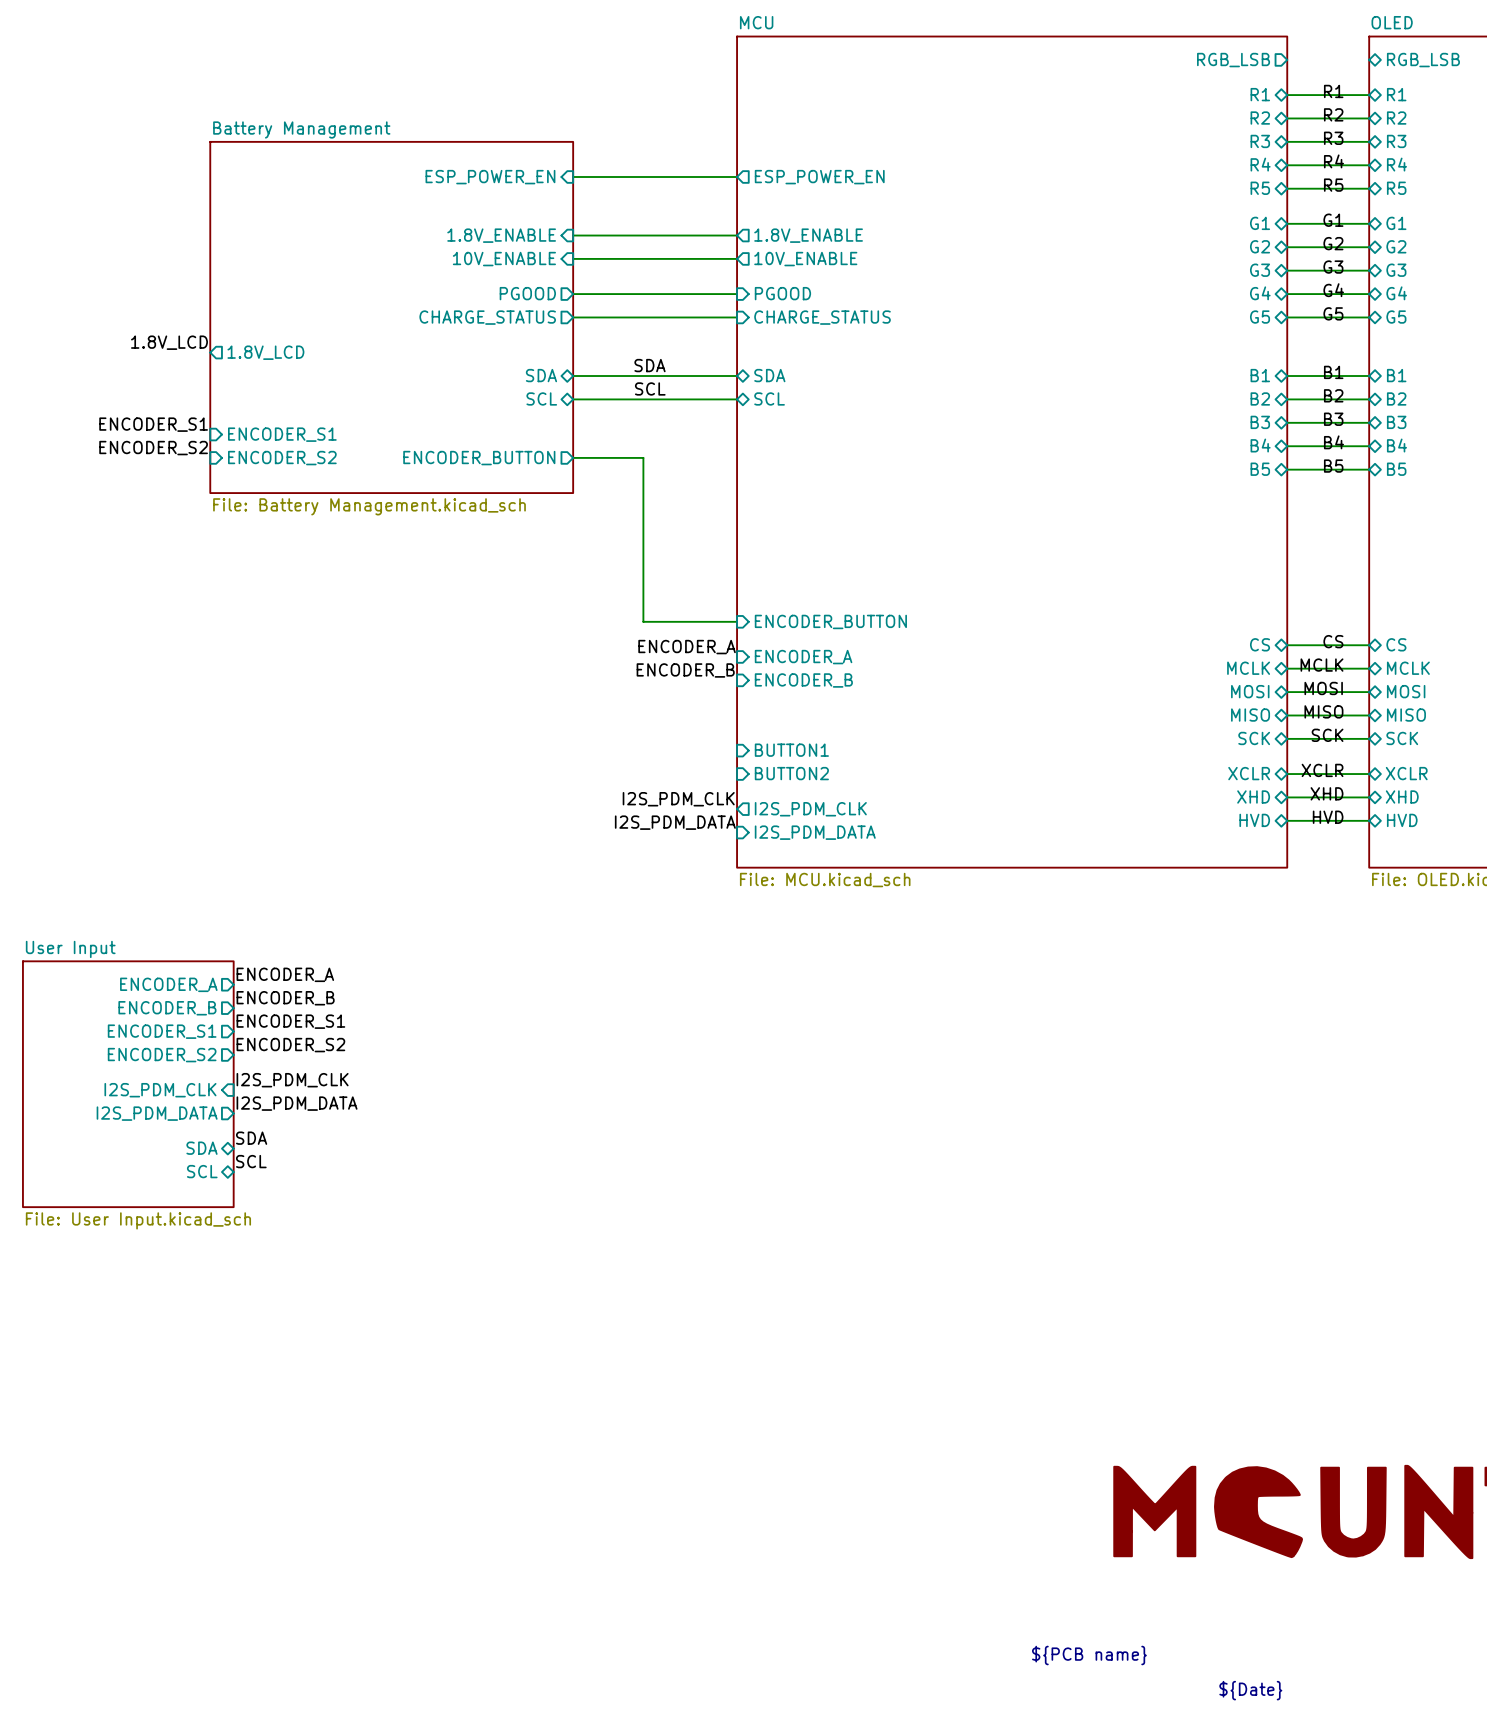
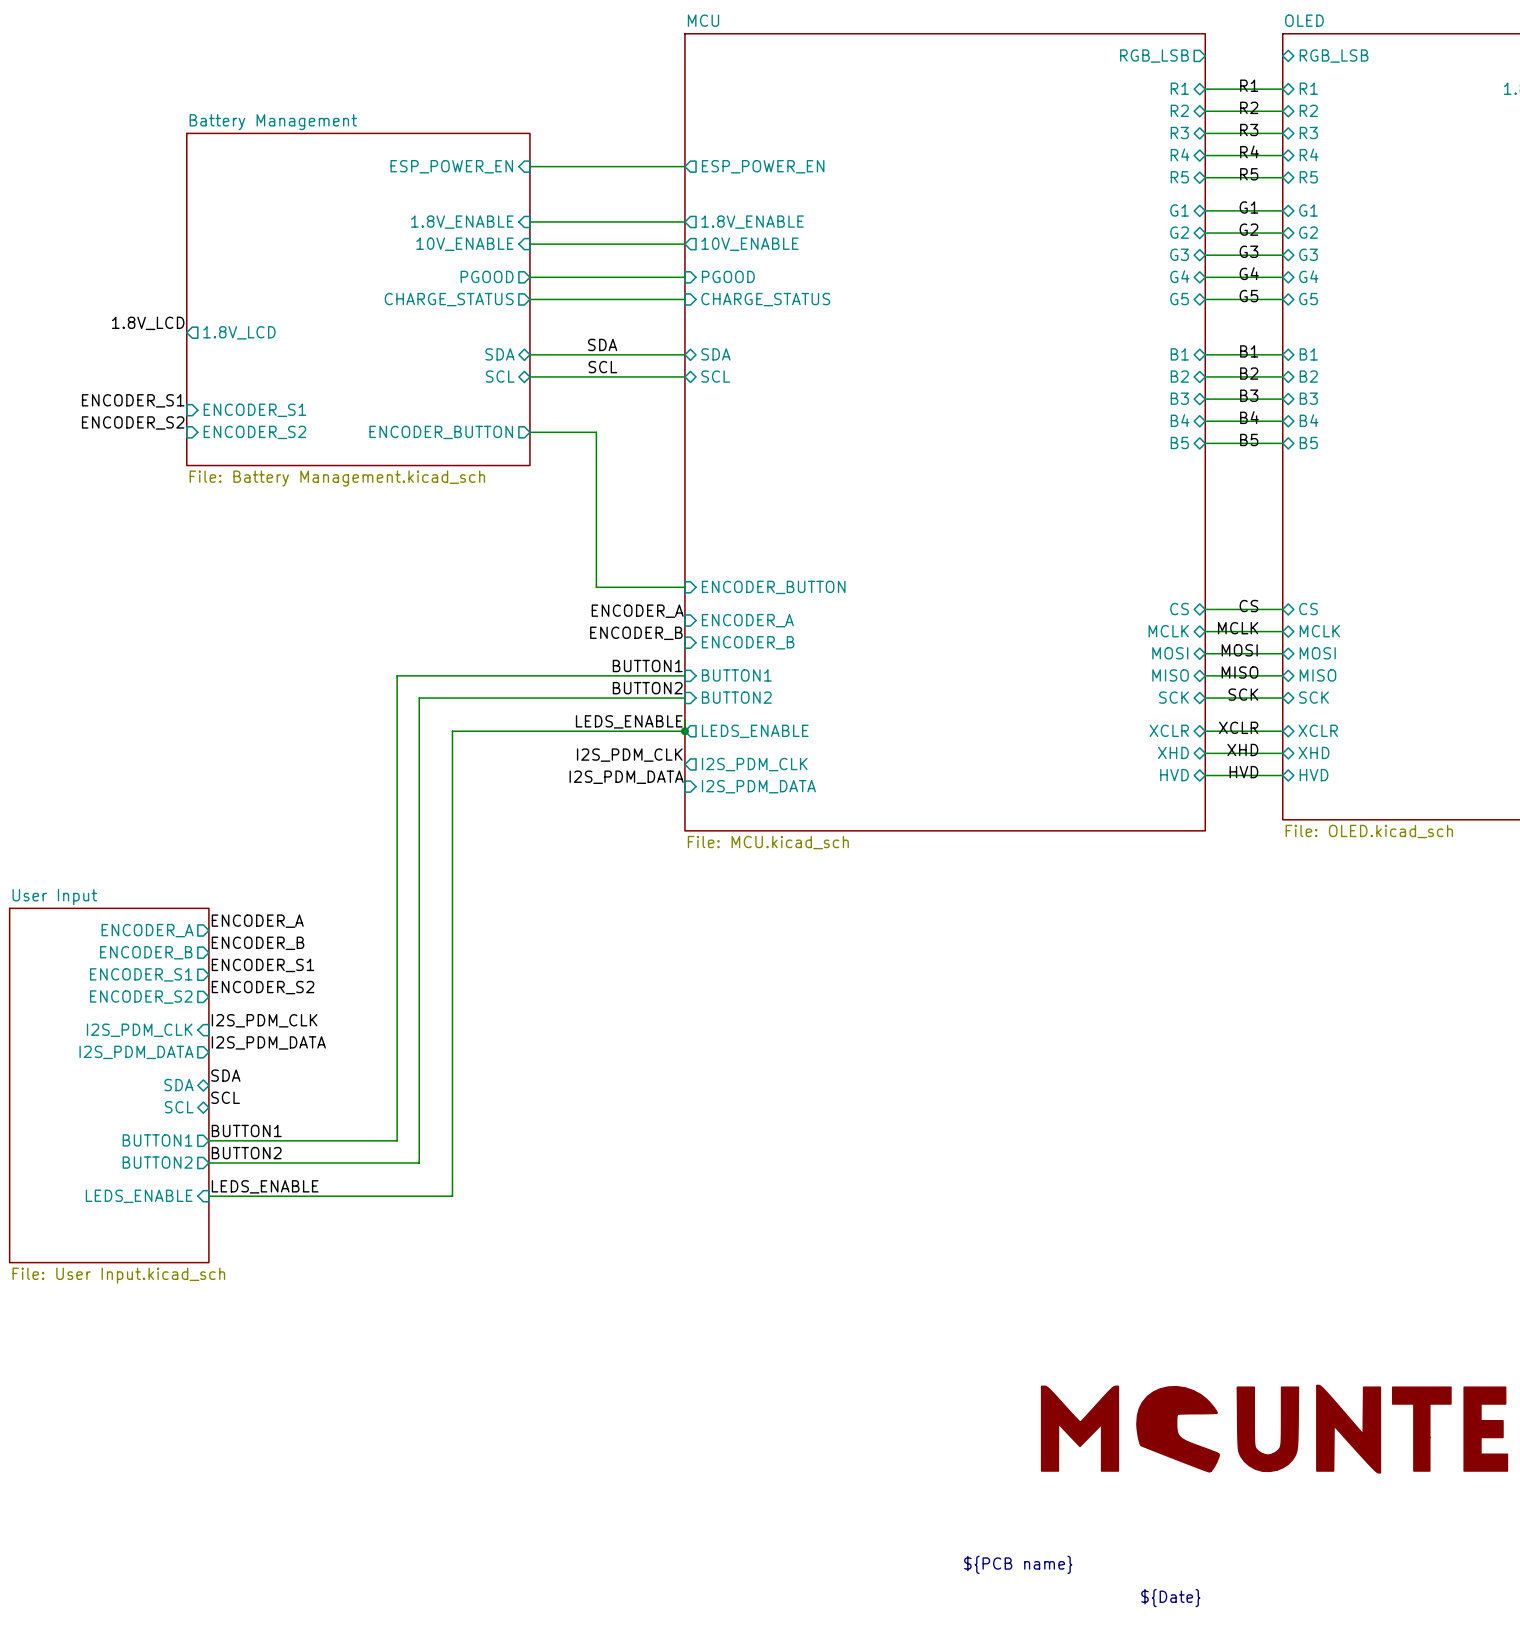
sheet MCU shape: [736, 35, 1288, 869] -> [684, 33, 1206, 832]
label: none -> BUTTON1 (647, 665)
wire: none -> (684, 675) (397, 675) (397, 1140) (208, 1140)
label: none -> BUTTON2 (647, 688)
wire: none -> (684, 698) (419, 698) (419, 1162) (208, 1162)
sheet pin: none -> BUTTON2 (736, 697)
sheet pin position: BUTTON1 (791, 750) -> BUTTON1 (736, 675)
wire: none -> (684, 720) (684, 731) (452, 731) (452, 1196) (208, 1196)
label: none -> LEDS_ENABLE (629, 721)
sheet pin shape: input (791, 773) -> output (755, 731)
sheet pin: BUTTON2 (791, 773) -> LEDS_ENABLE (755, 731)
junction: none -> (684, 731)
sheet User Input: File: User Input.kicad_sch (128, 1084) -> none
sheet User Input: none -> File: User Input.kicad_sch (109, 1085)
label: none -> BUTTON1 (246, 1130)
sheet pin: none -> BUTTON1 (157, 1140)
label: none -> BUTTON2 (246, 1153)
sheet pin: none -> BUTTON2 (157, 1162)
label: none -> LEDS_ENABLE (265, 1186)
sheet pin: none -> LEDS_ENABLE (139, 1196)

